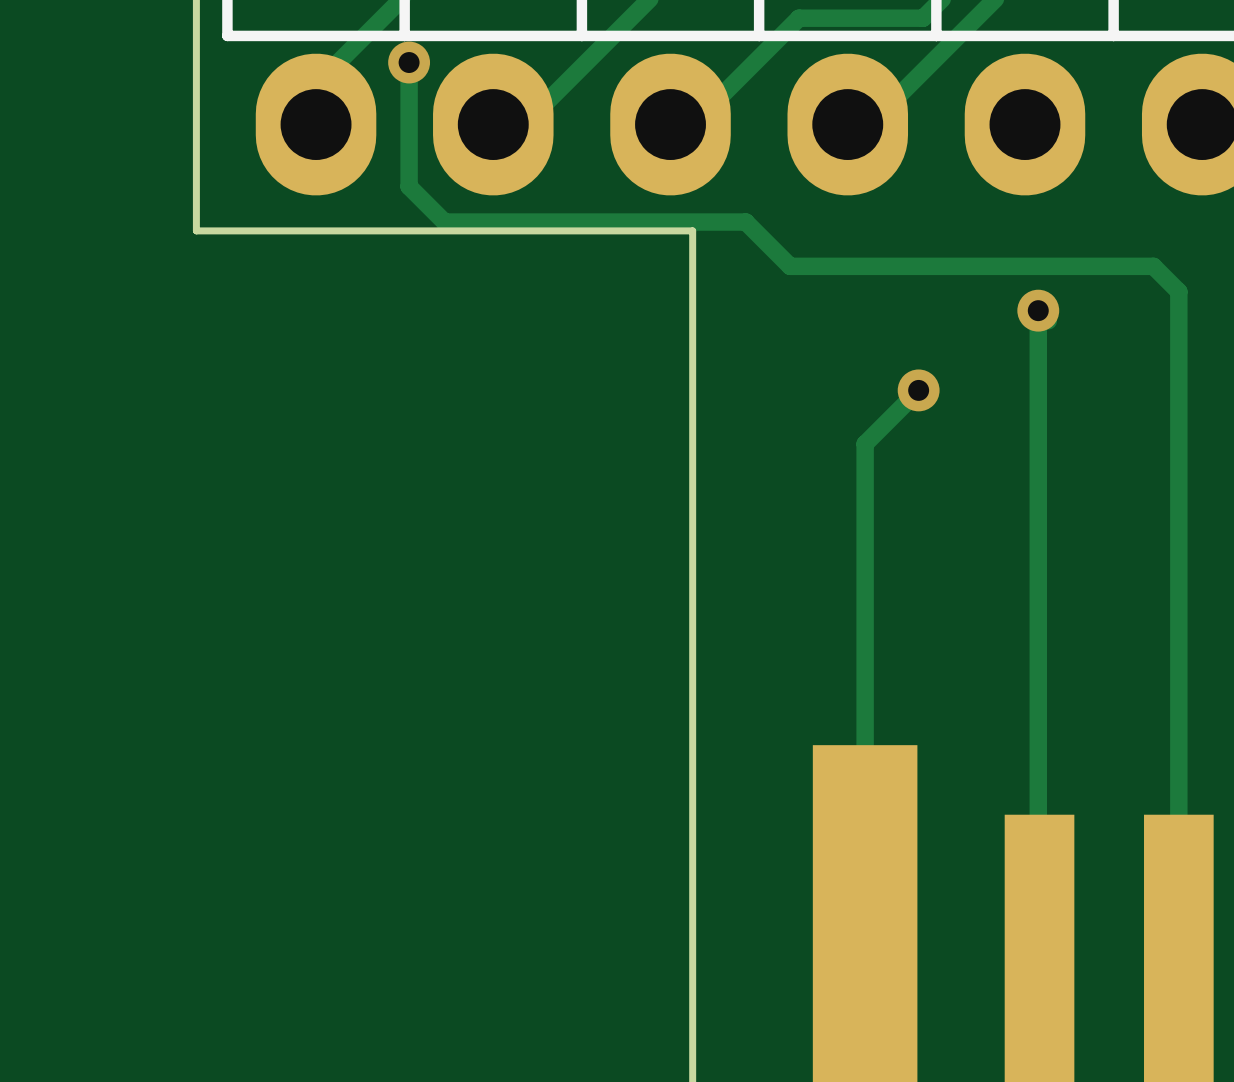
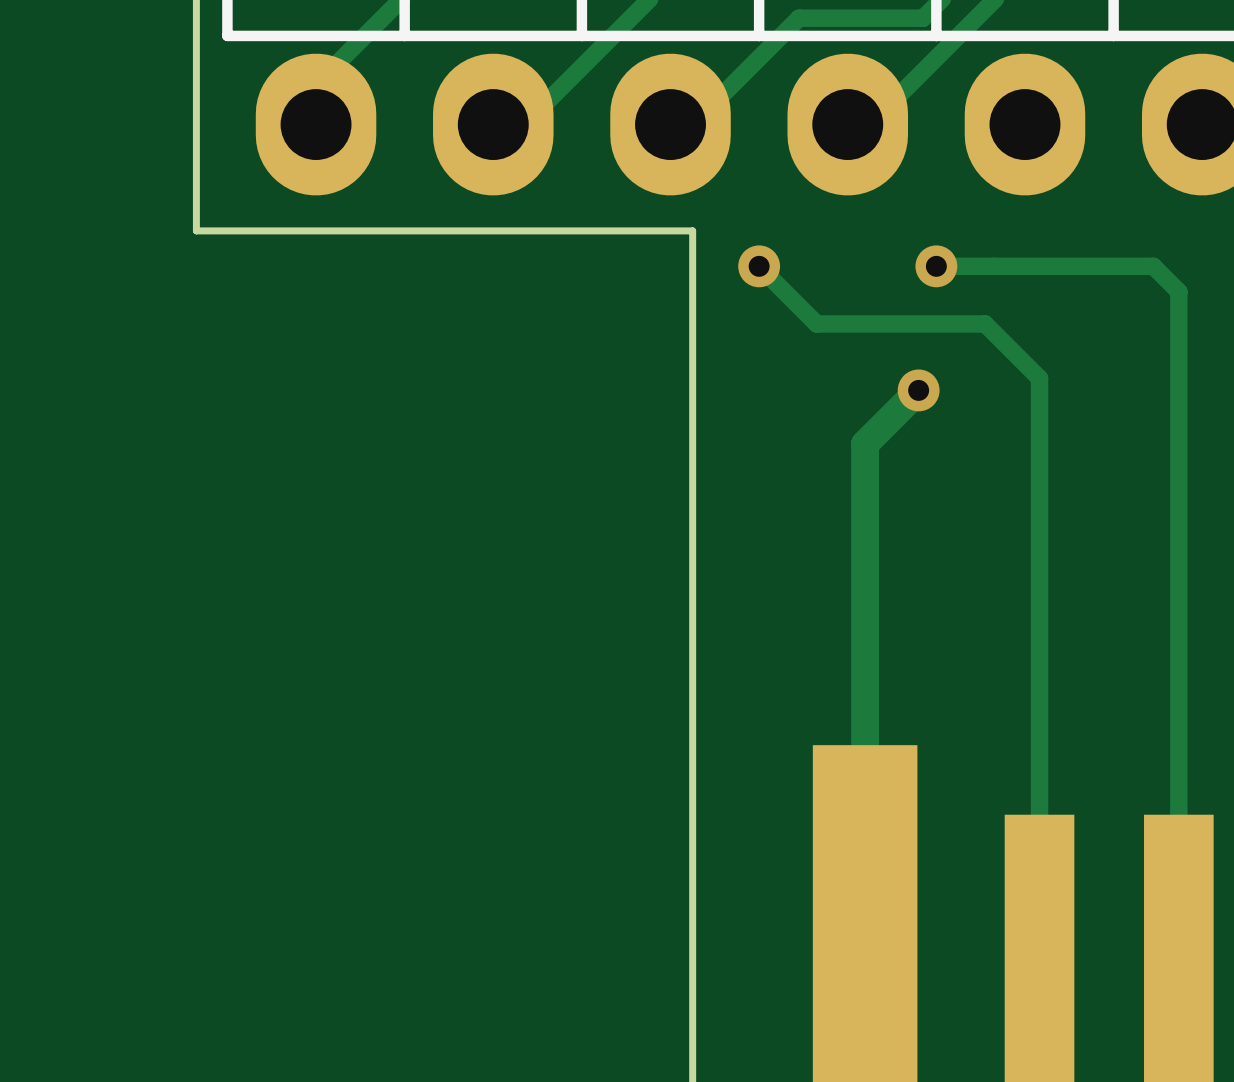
track: (409, 62) (409, 186) (444, 222) (745, 222) (790, 266) (936, 266) -> none
via: (409, 62) -> none
via: none -> (759, 266)
via position: (1038, 310) -> (936, 266)
track: (1048, 320) (1038, 310) (1038, 1040) -> (759, 266) (816, 323) (985, 323) (1039, 378) (1039, 1041)
track width: thin (918, 390) (865, 443) (865, 1006) -> thick (918, 390) (865, 443) (865, 1006)

